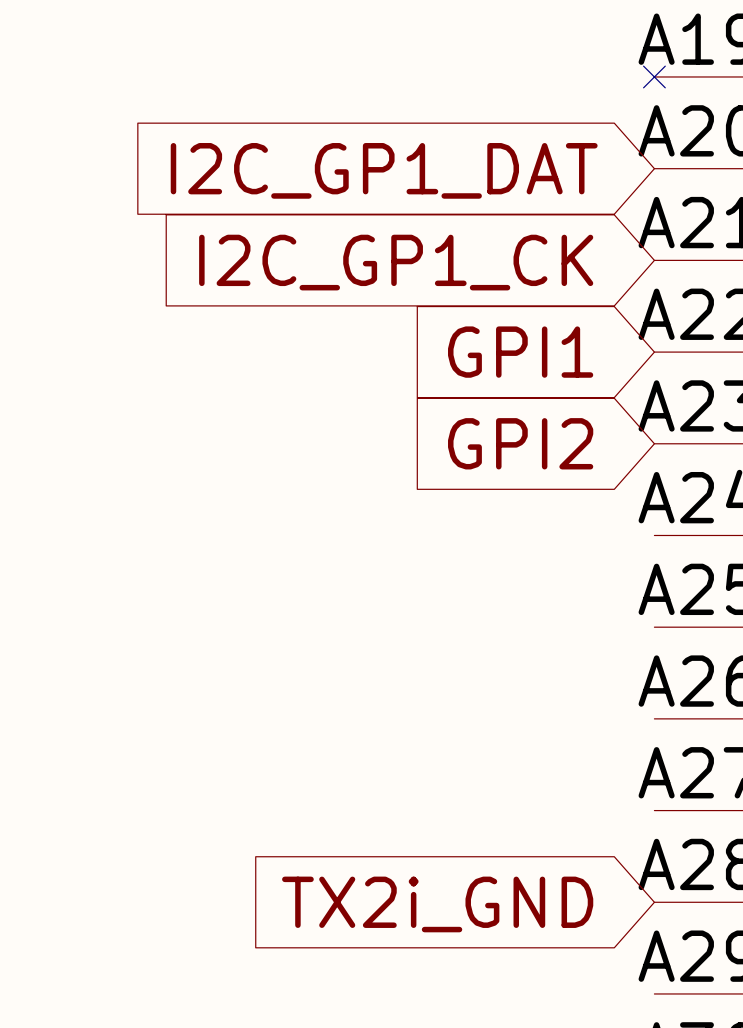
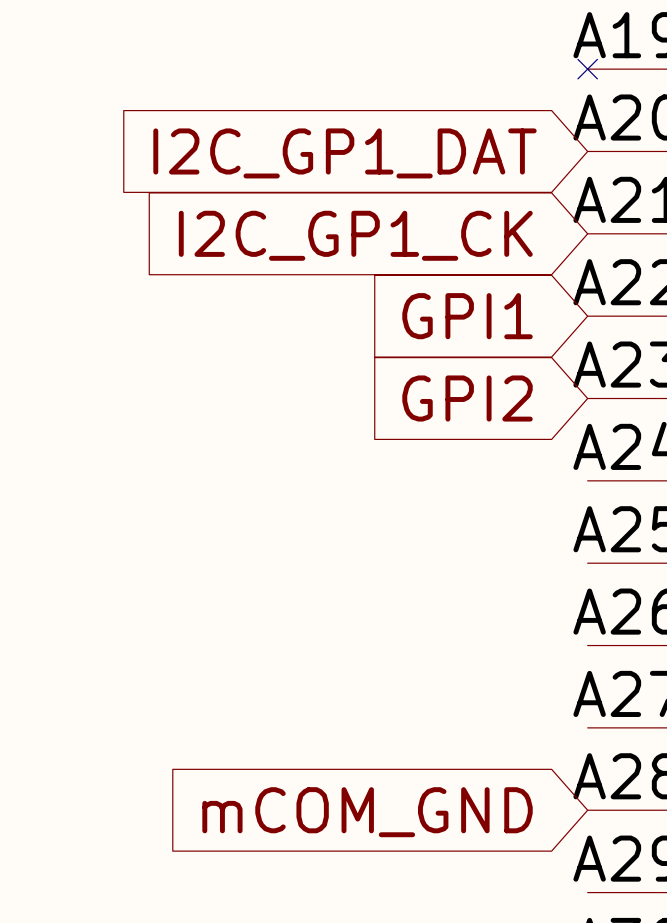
global label: TX2i_GND (437, 904) -> mCOM_GND (367, 812)

